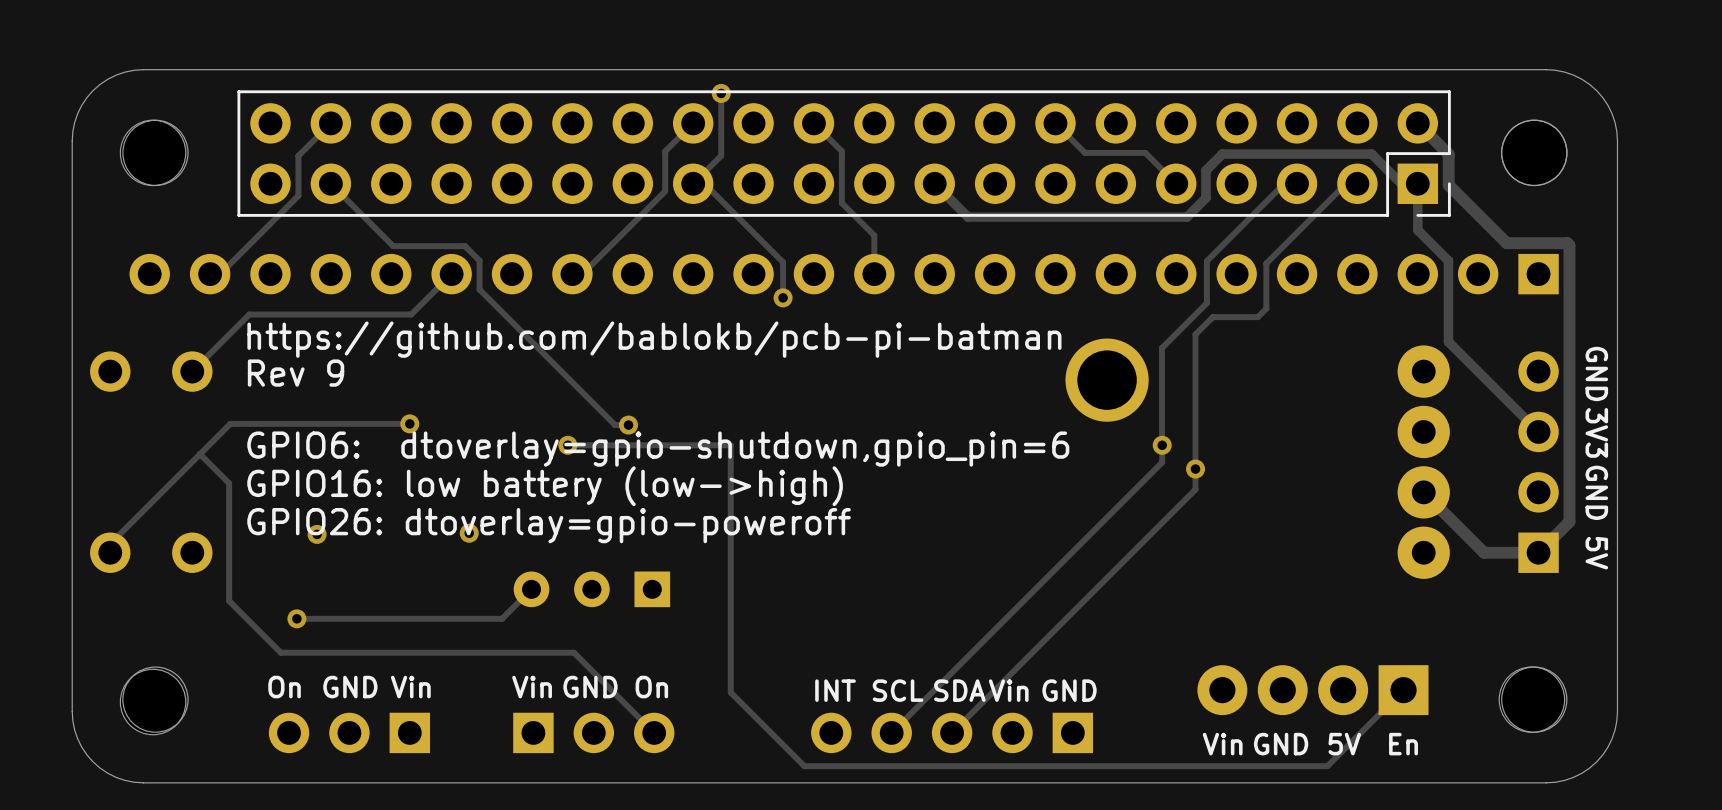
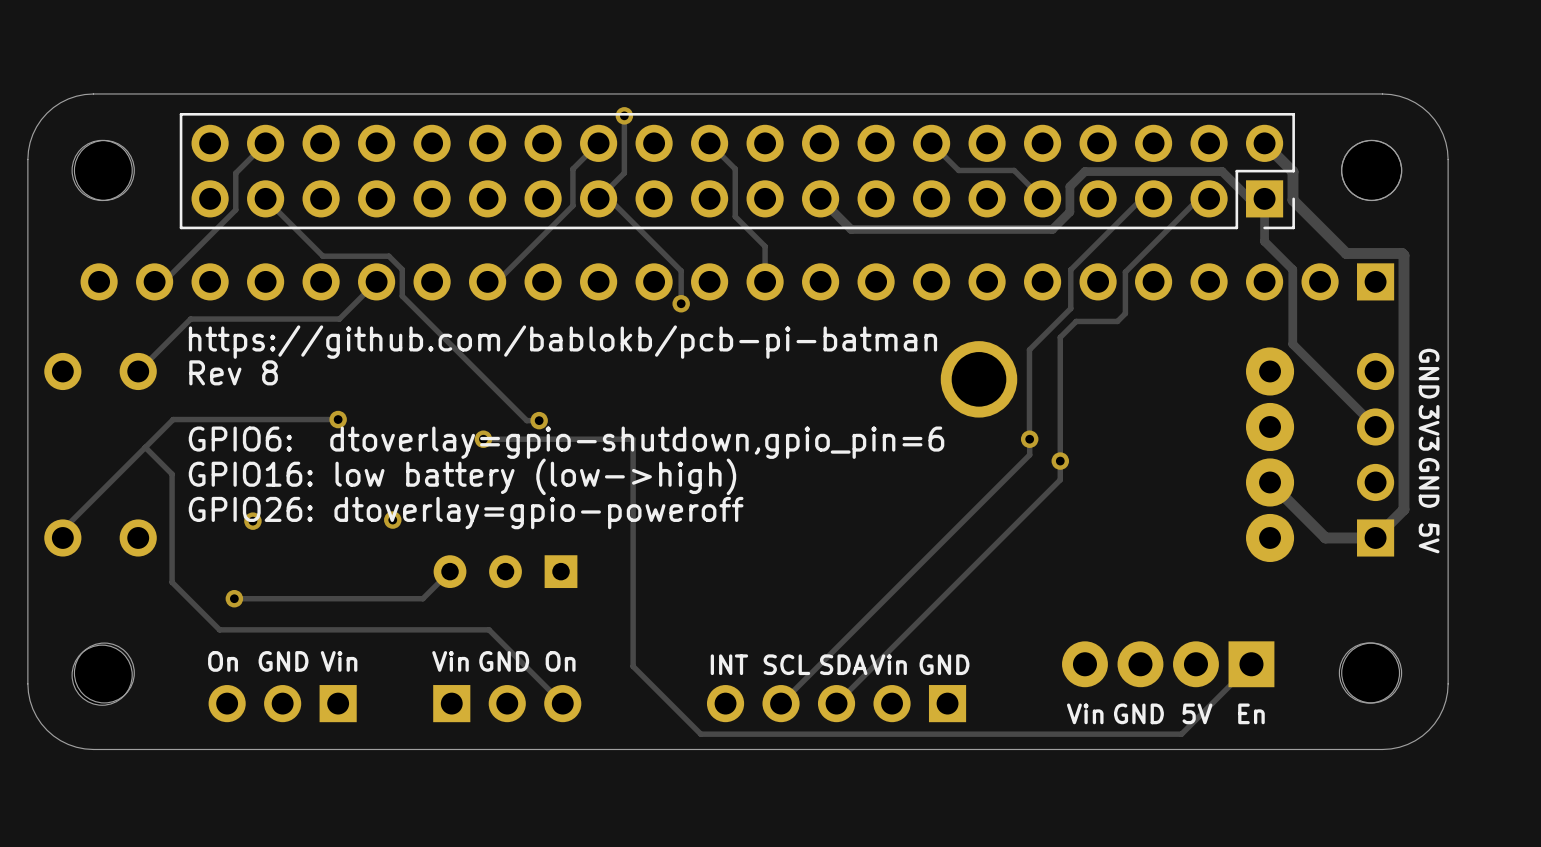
text: Rev 9 (296, 373) -> Rev 8 (233, 372)

